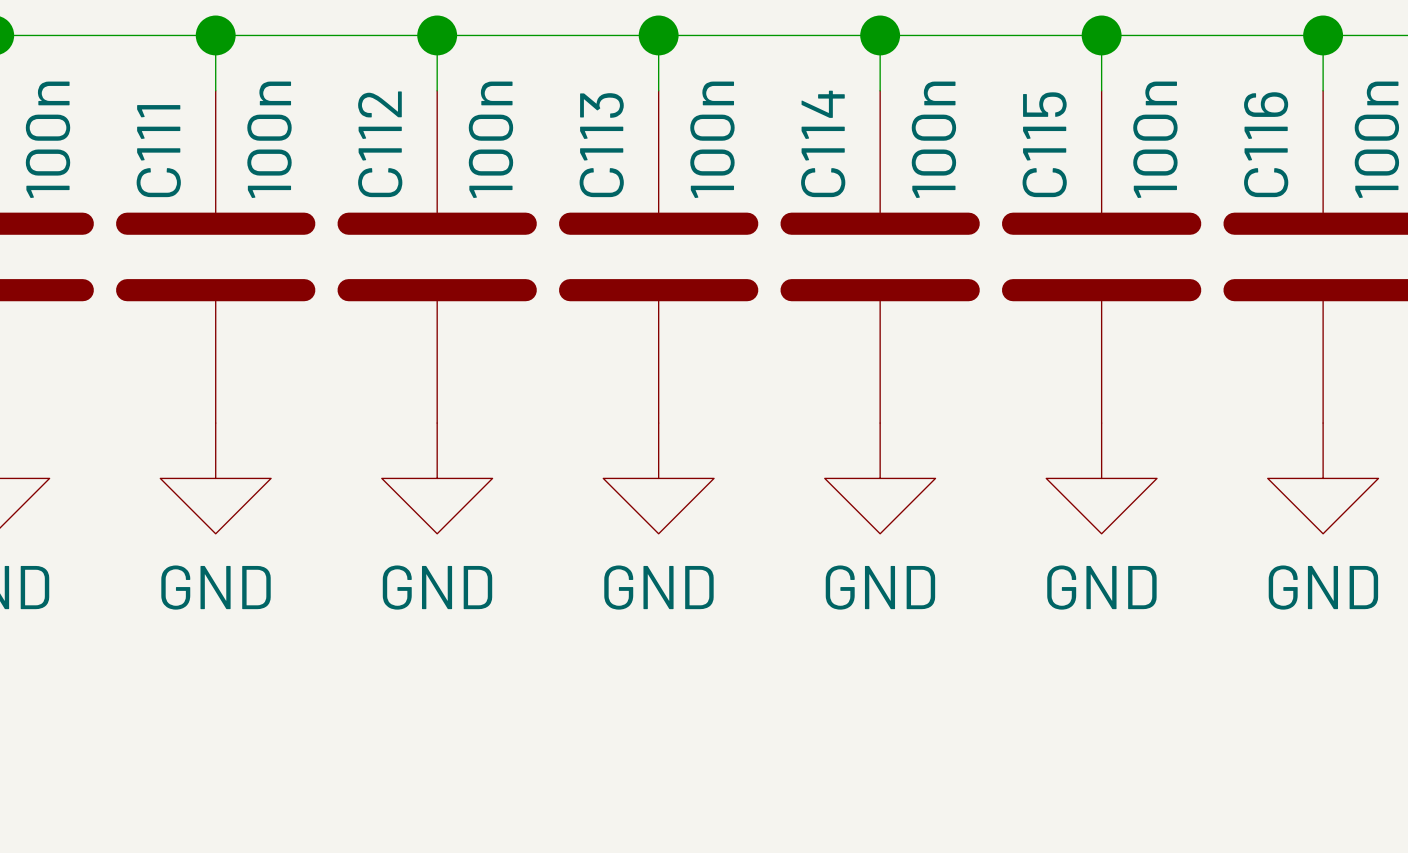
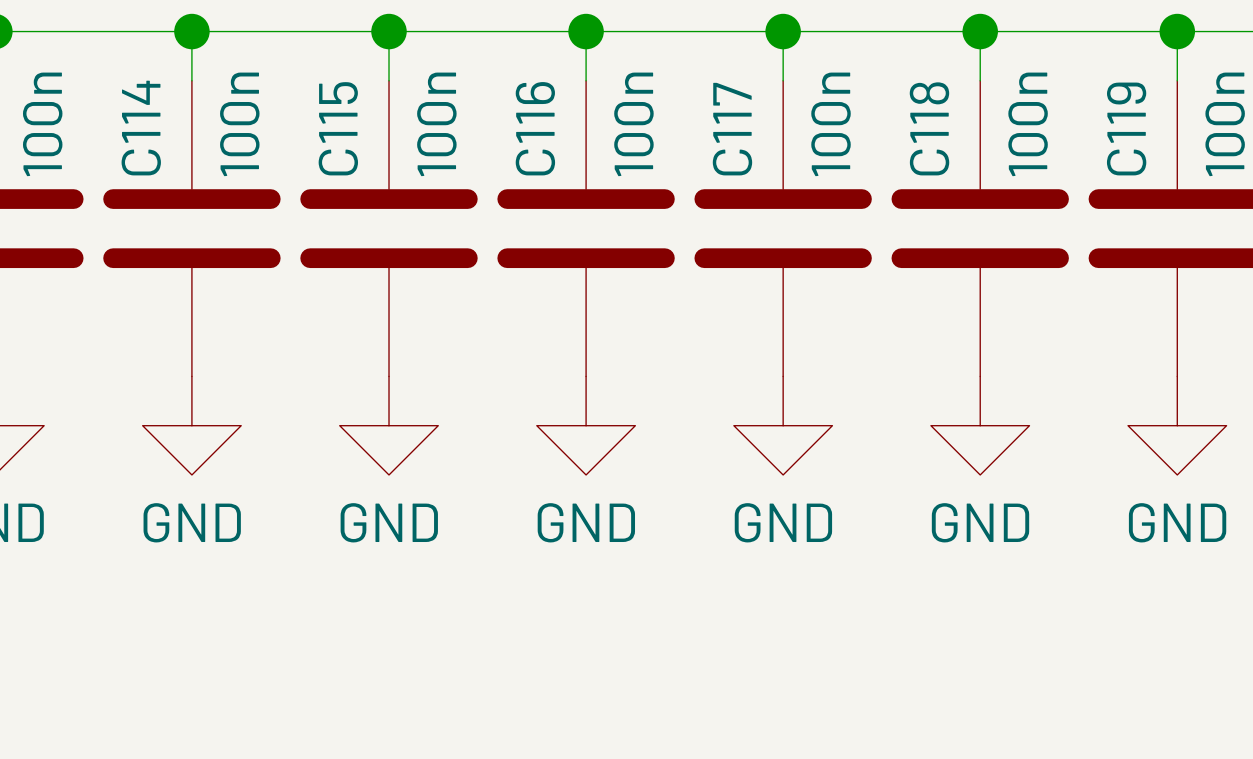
C114 name: C114 (823, 143) -> C117 (732, 129)
C112 name: C112 (380, 144) -> C115 (338, 128)
C115 name: C115 (1044, 144) -> C118 (929, 128)
C116 name: C116 (1266, 144) -> C119 (1126, 128)
C113 name: C113 (601, 145) -> C116 (535, 128)
C111 name: C111 (158, 151) -> C114 (141, 128)

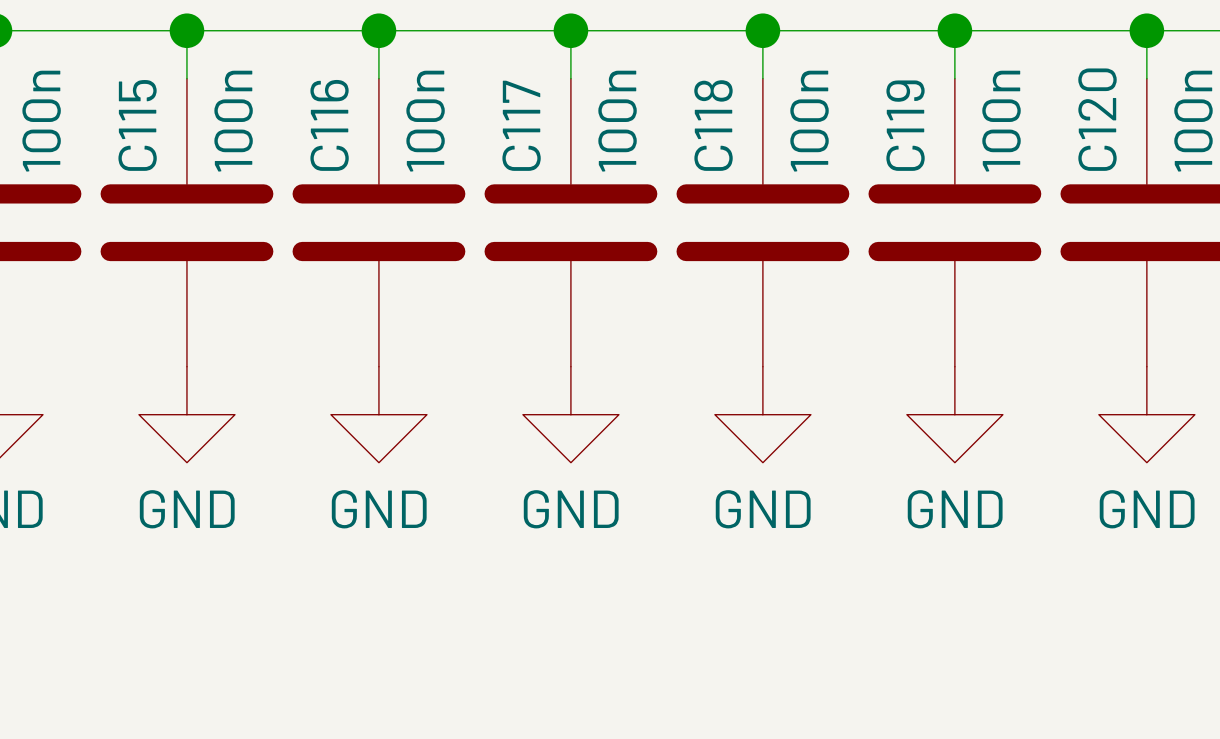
C114 name: C114 (141, 128) -> C115 (137, 125)
C115 name: C115 (338, 128) -> C116 (329, 125)
C116 name: C116 (535, 128) -> C117 (521, 125)
C118 name: C118 (929, 128) -> C119 (905, 125)
C119 name: C119 (1126, 128) -> C120 (1097, 119)
C117 name: C117 (732, 129) -> C118 (713, 125)

